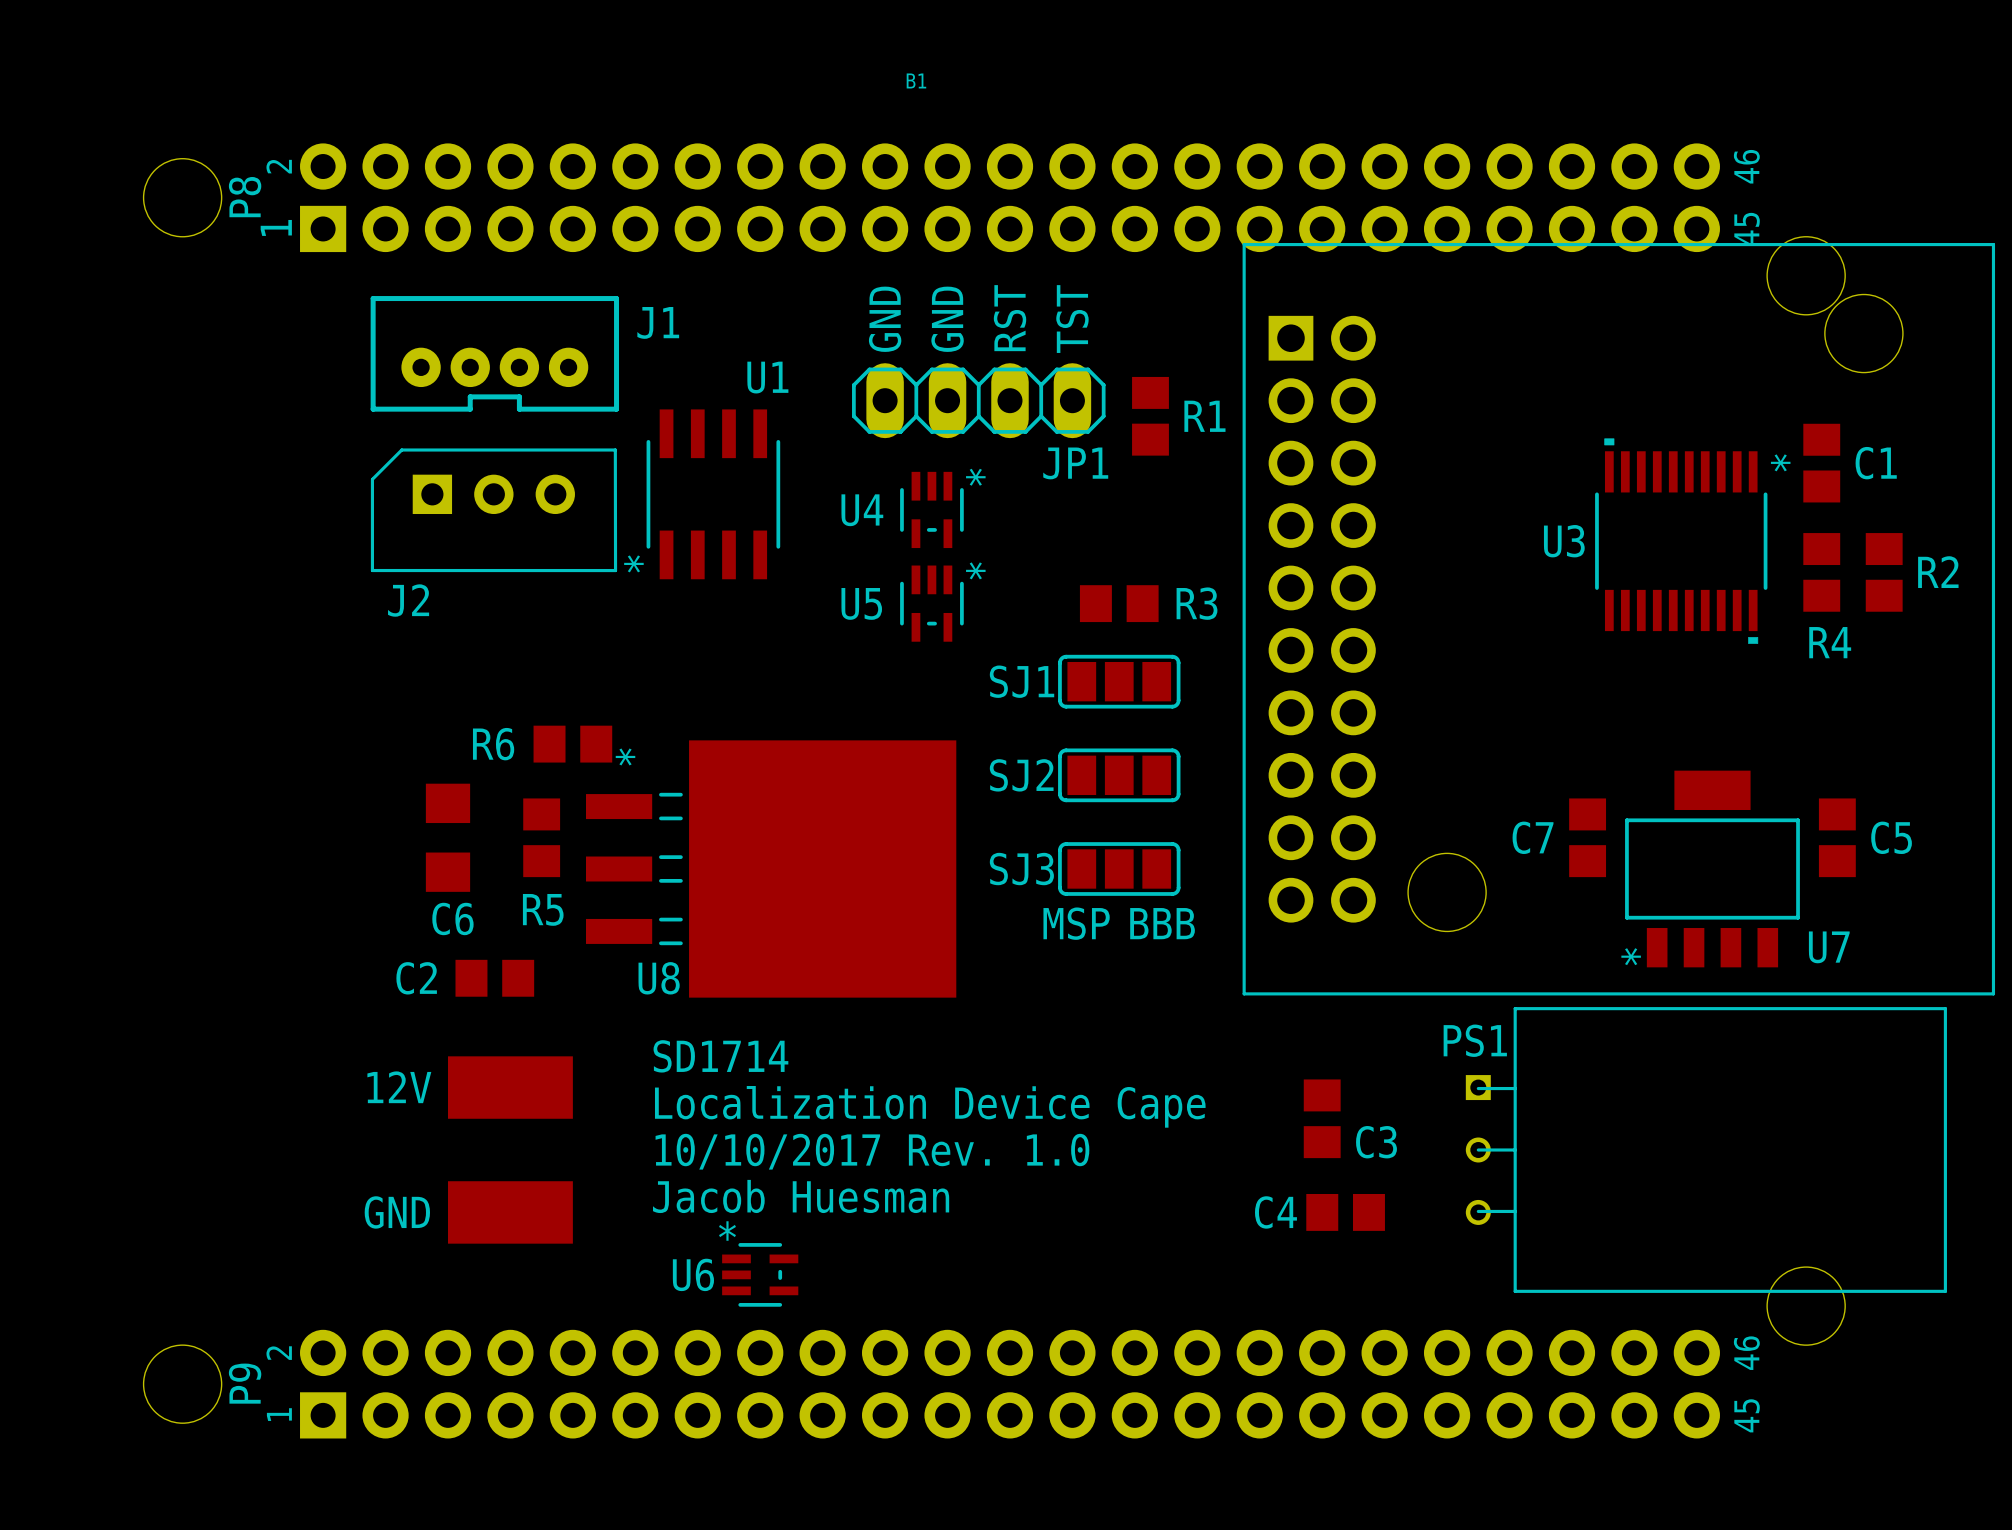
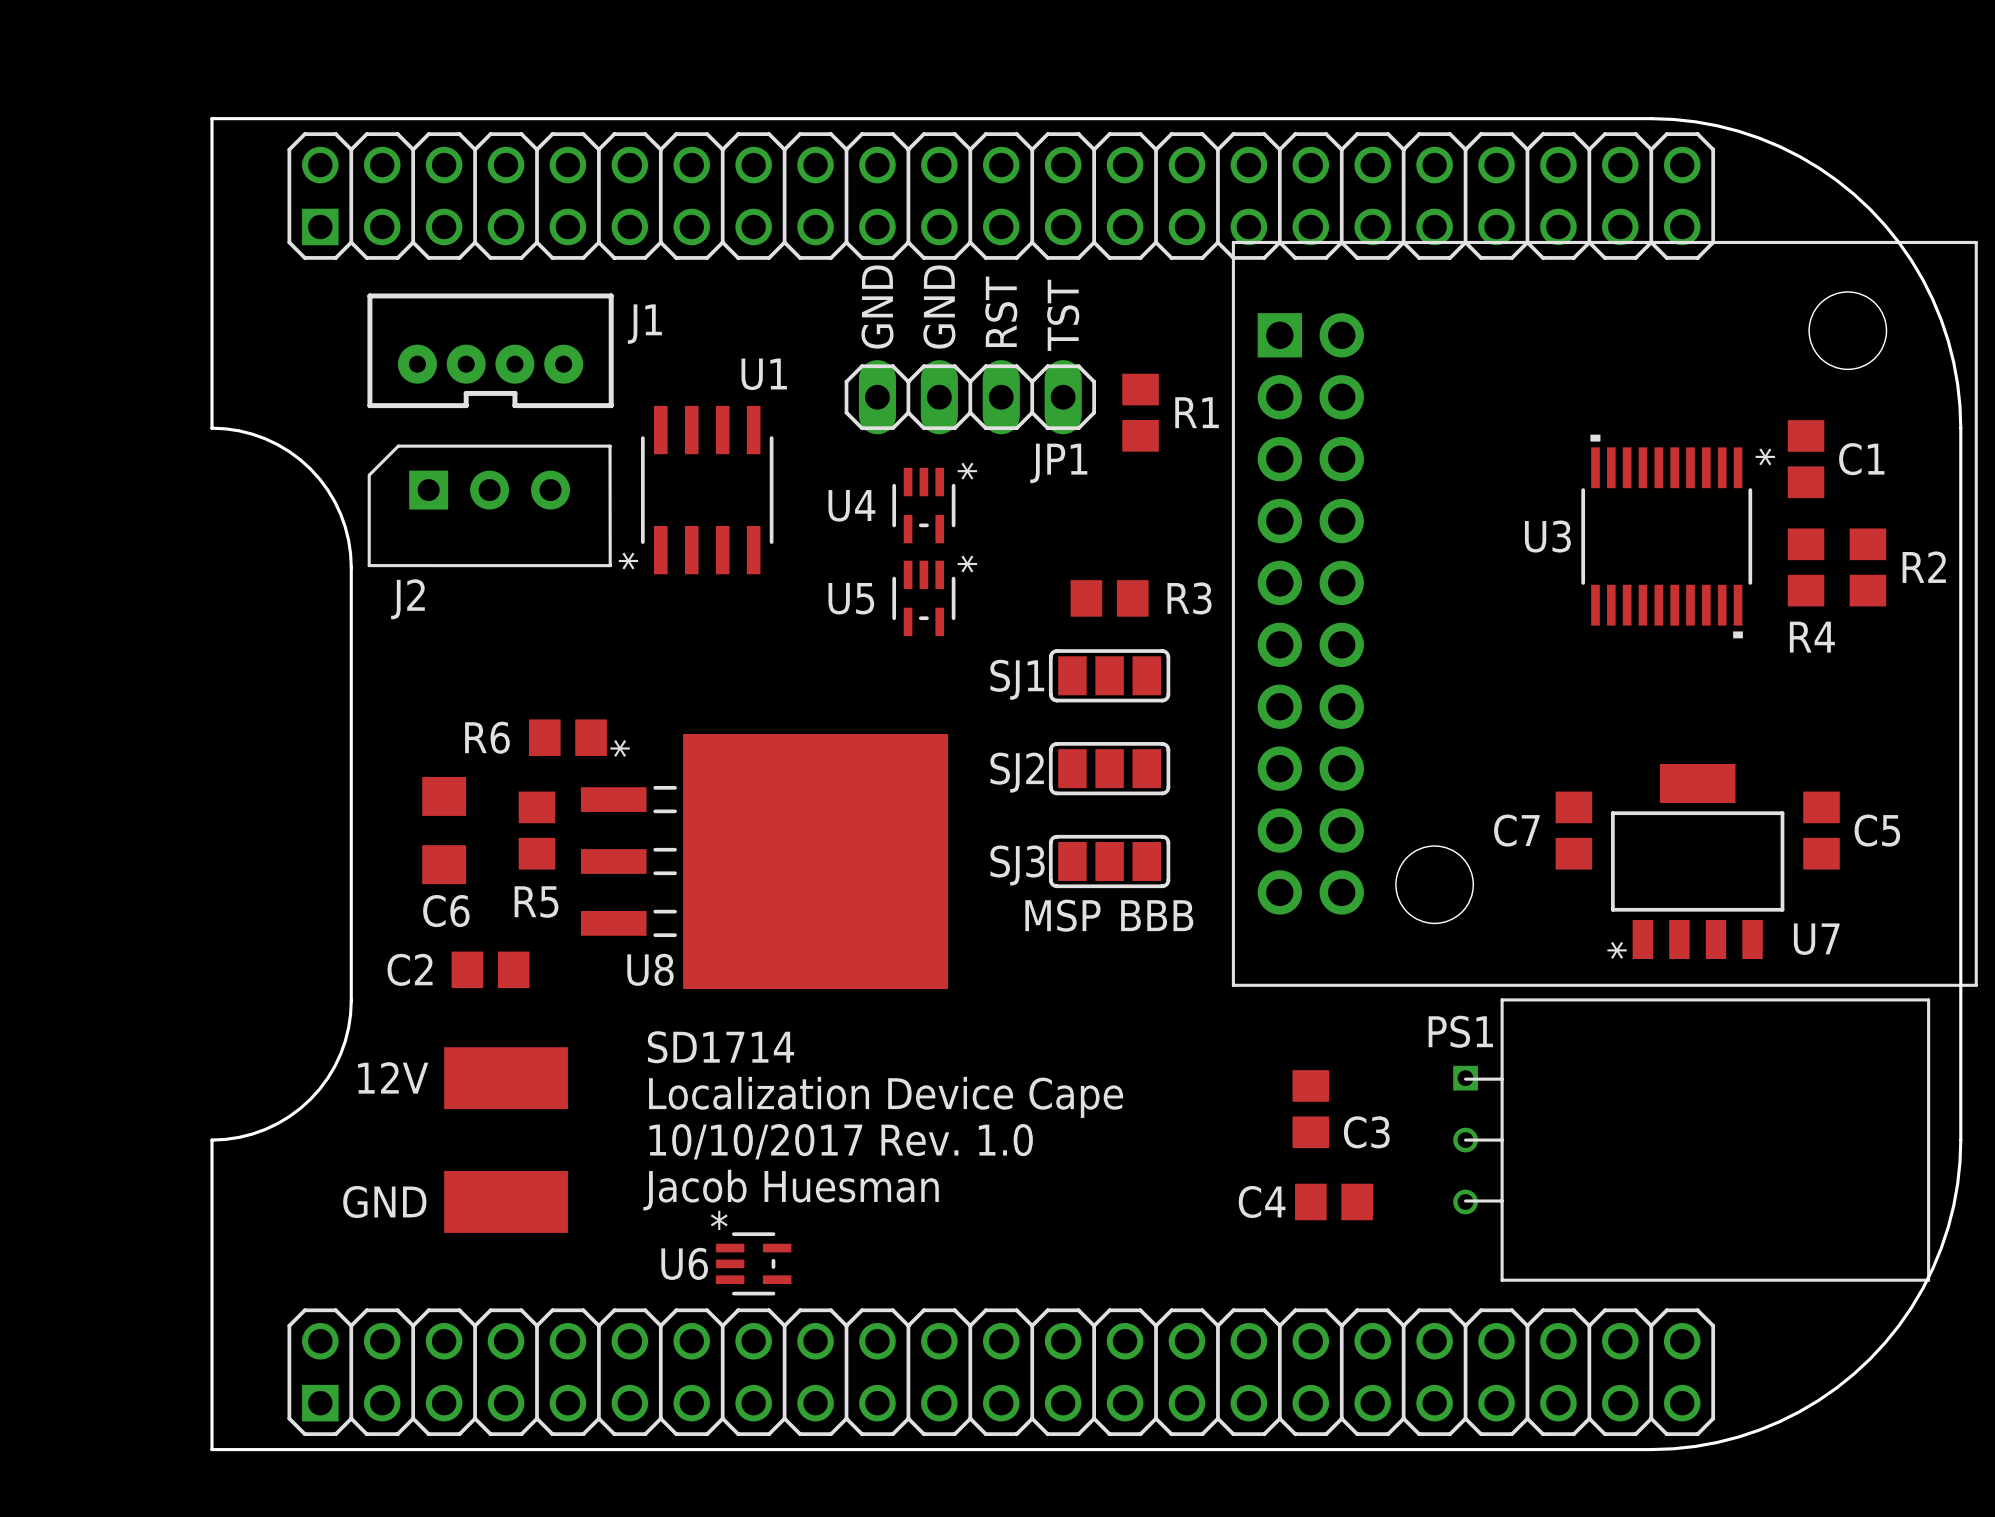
B1: (994, 790) -> none
part: none -> (1086, 784)

